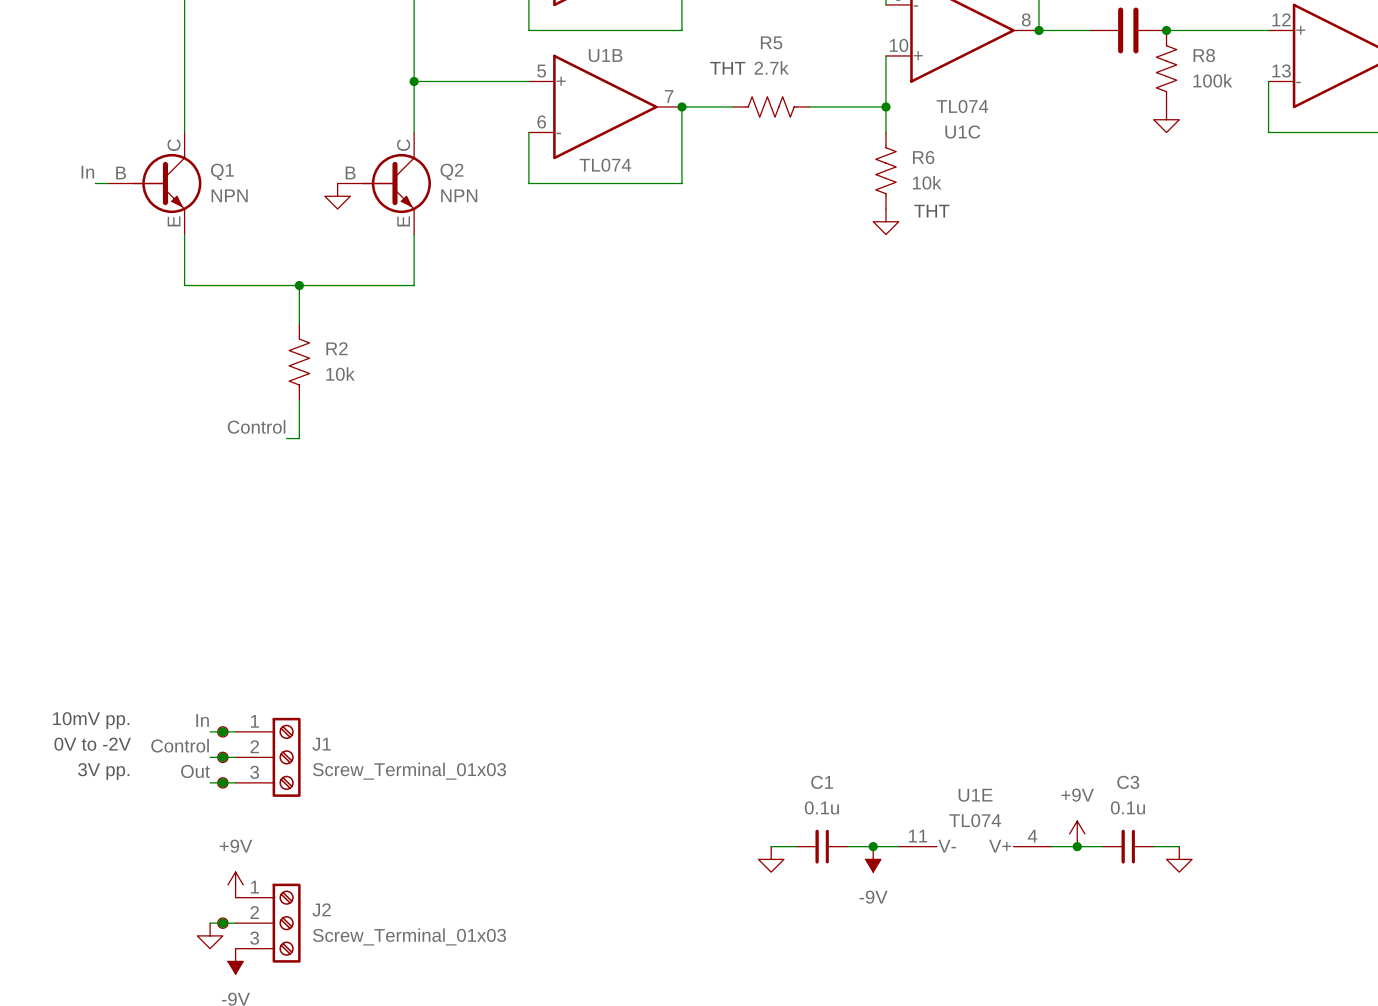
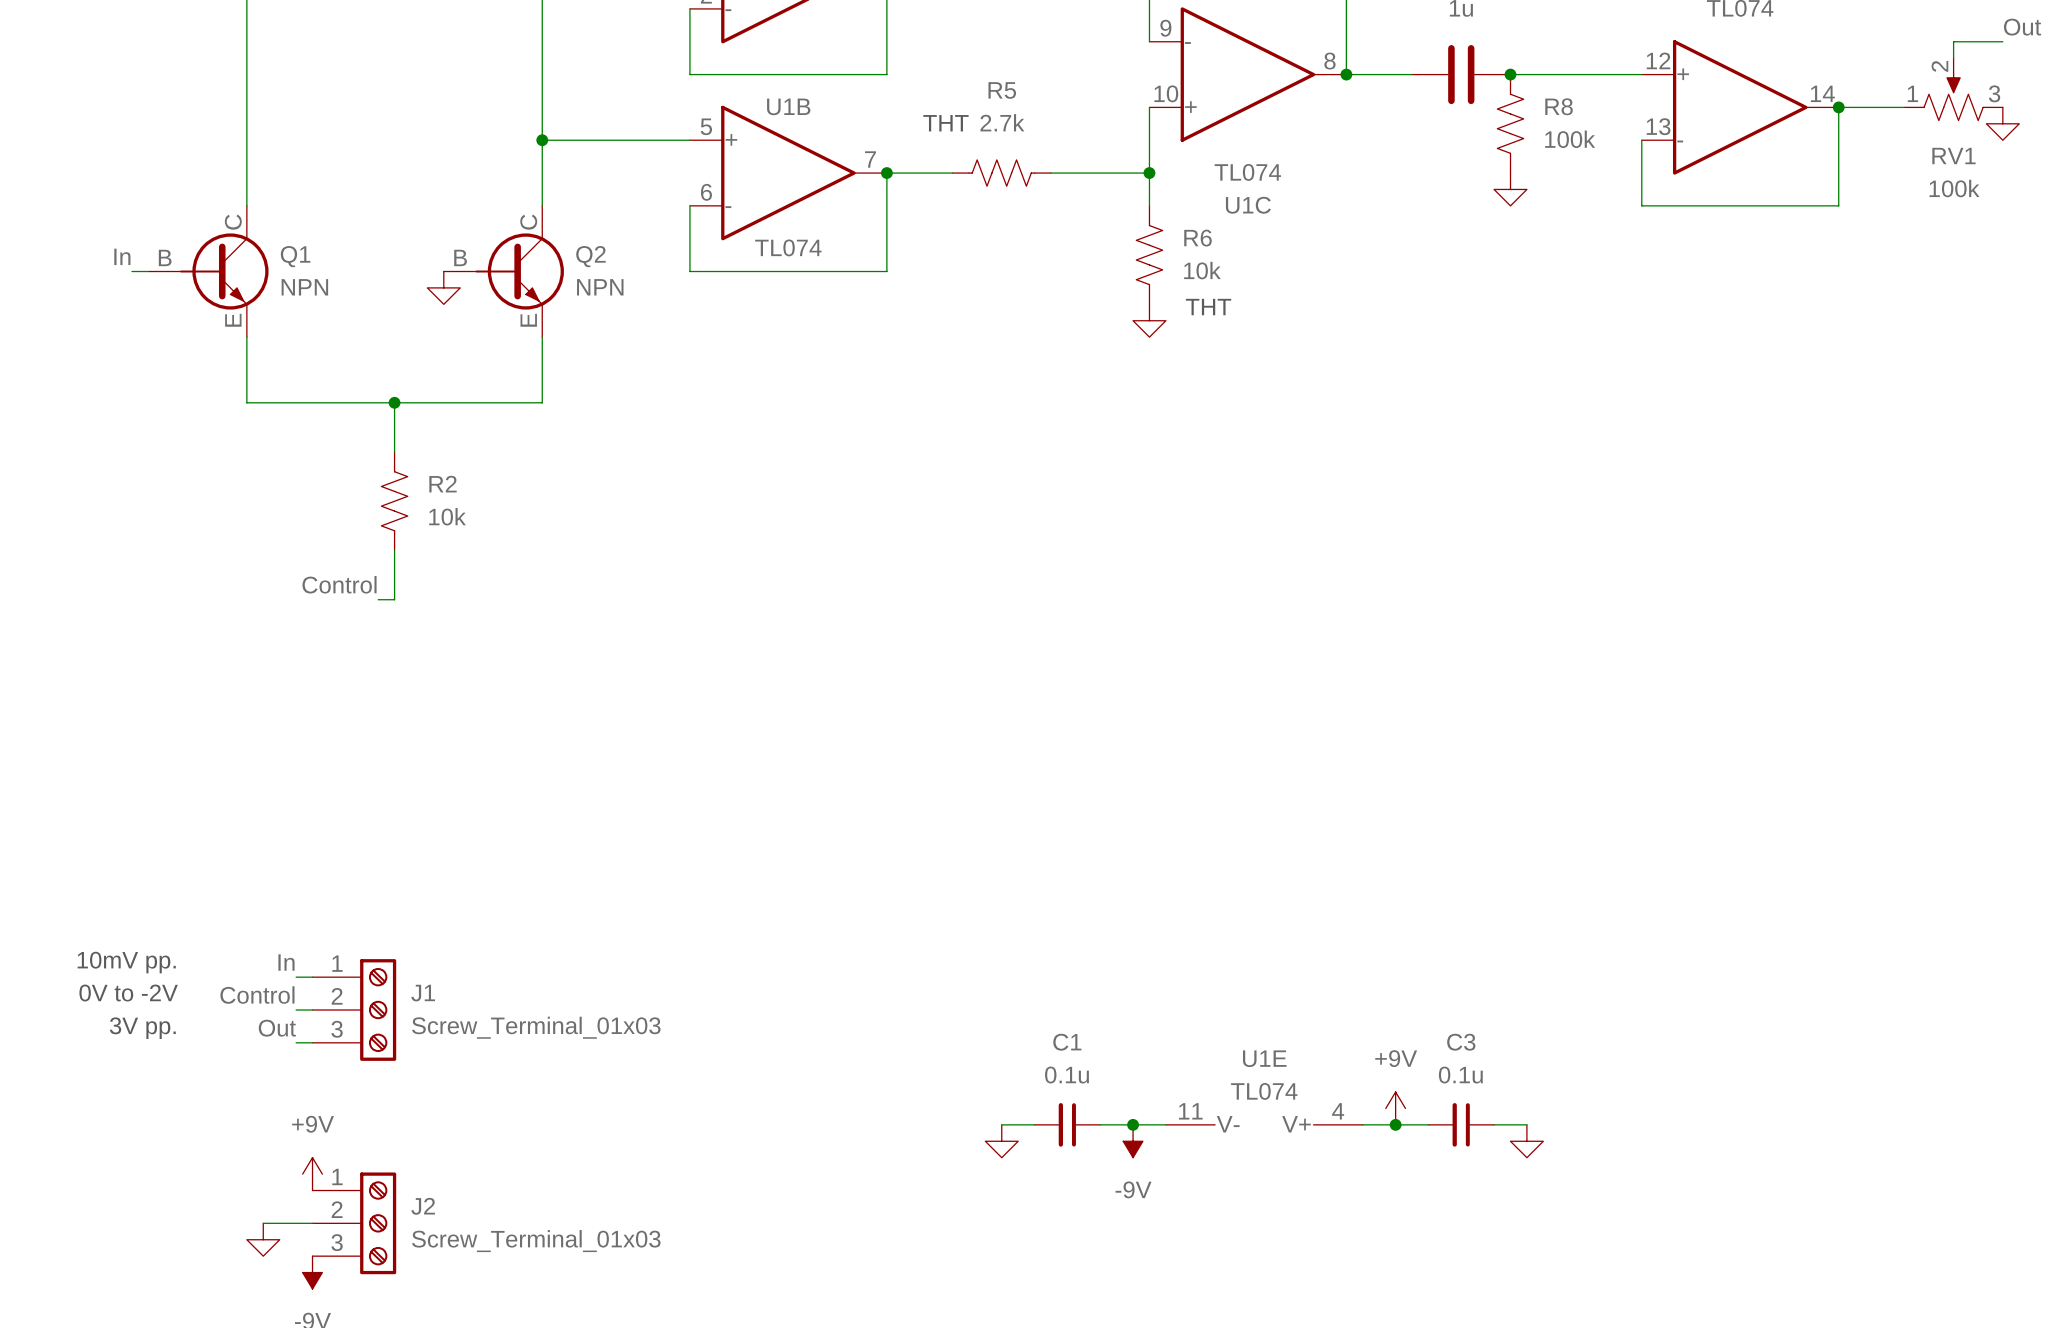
label position: In (202, 720) -> In (286, 962)
wire: (210, 731) (222, 731) -> none
junction: (222, 731) -> none
part: (222, 731) -> none
label position: Control (180, 745) -> Control (257, 995)
wire: (210, 757) (222, 757) -> none
junction: (222, 757) -> none
part: (222, 757) -> none
label position: Out (195, 771) -> Out (277, 1028)
wire: (210, 782) (222, 782) -> (263, 1223) (279, 1223)
junction: (222, 782) -> none
part: (222, 782) -> none
junction: (222, 923) -> none
part: (222, 923) -> none
power symbol position: (210, 935) -> (263, 1239)

